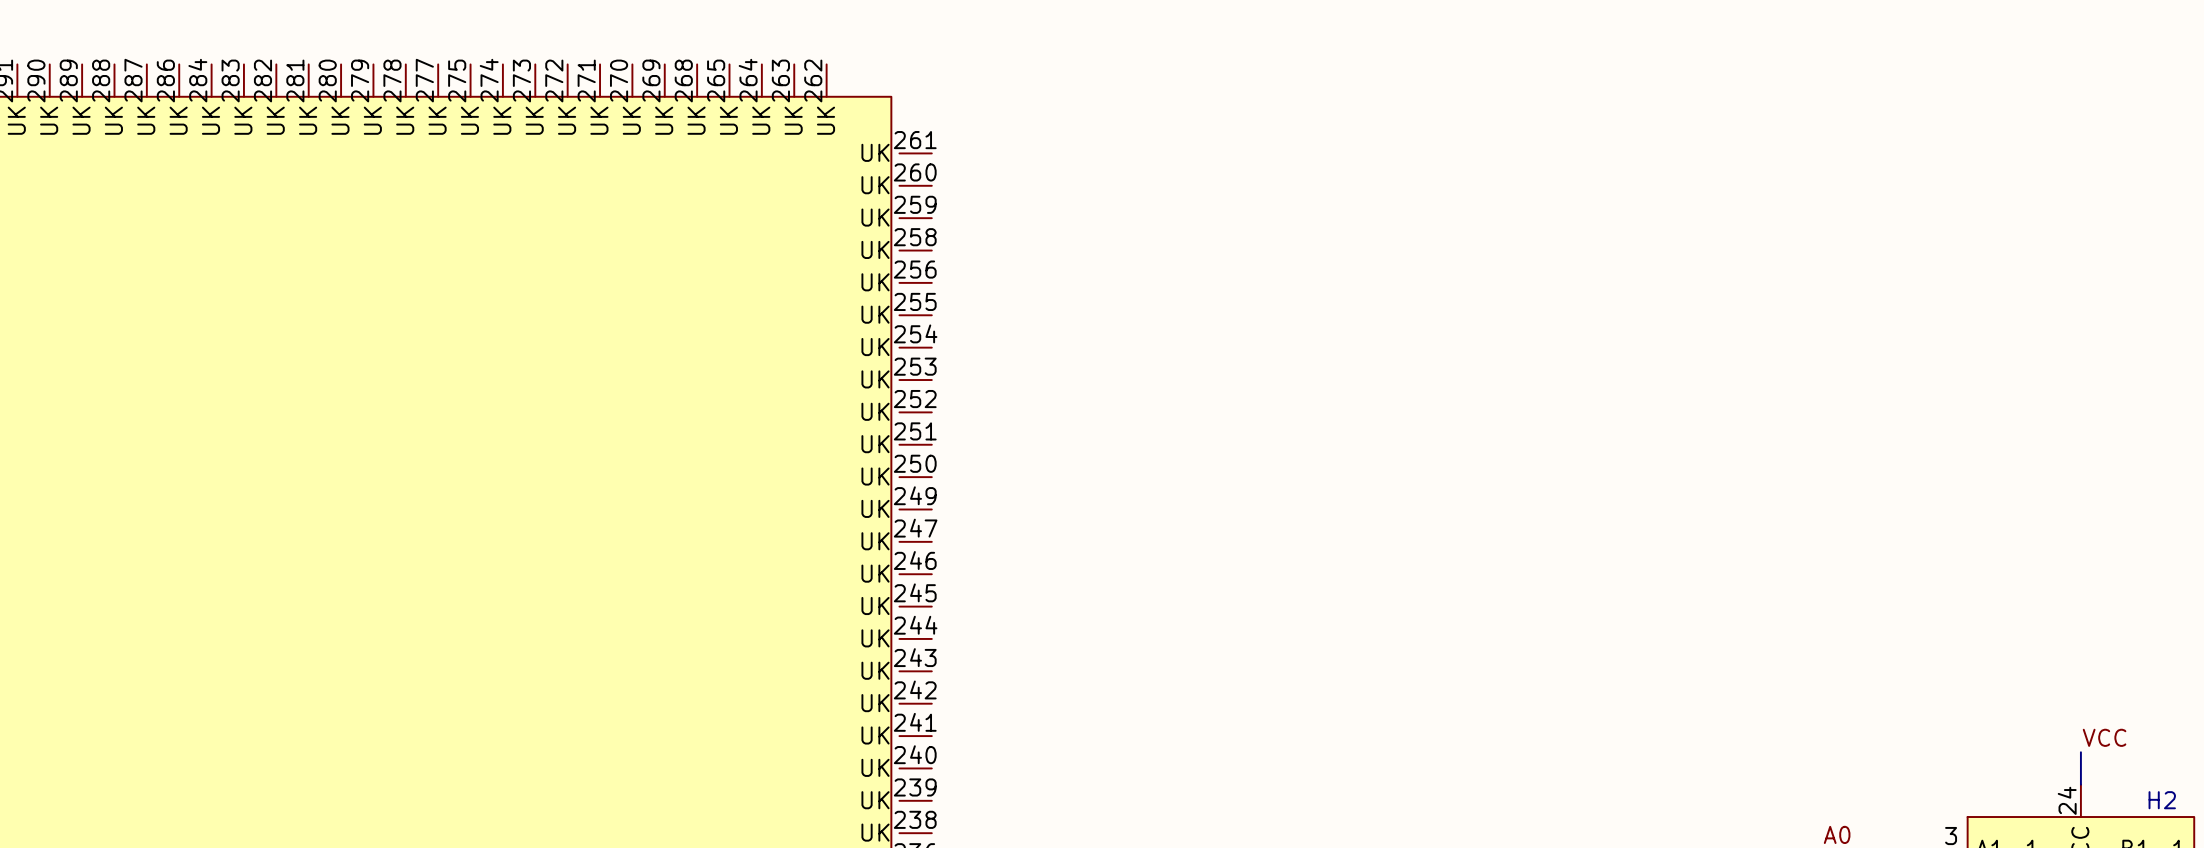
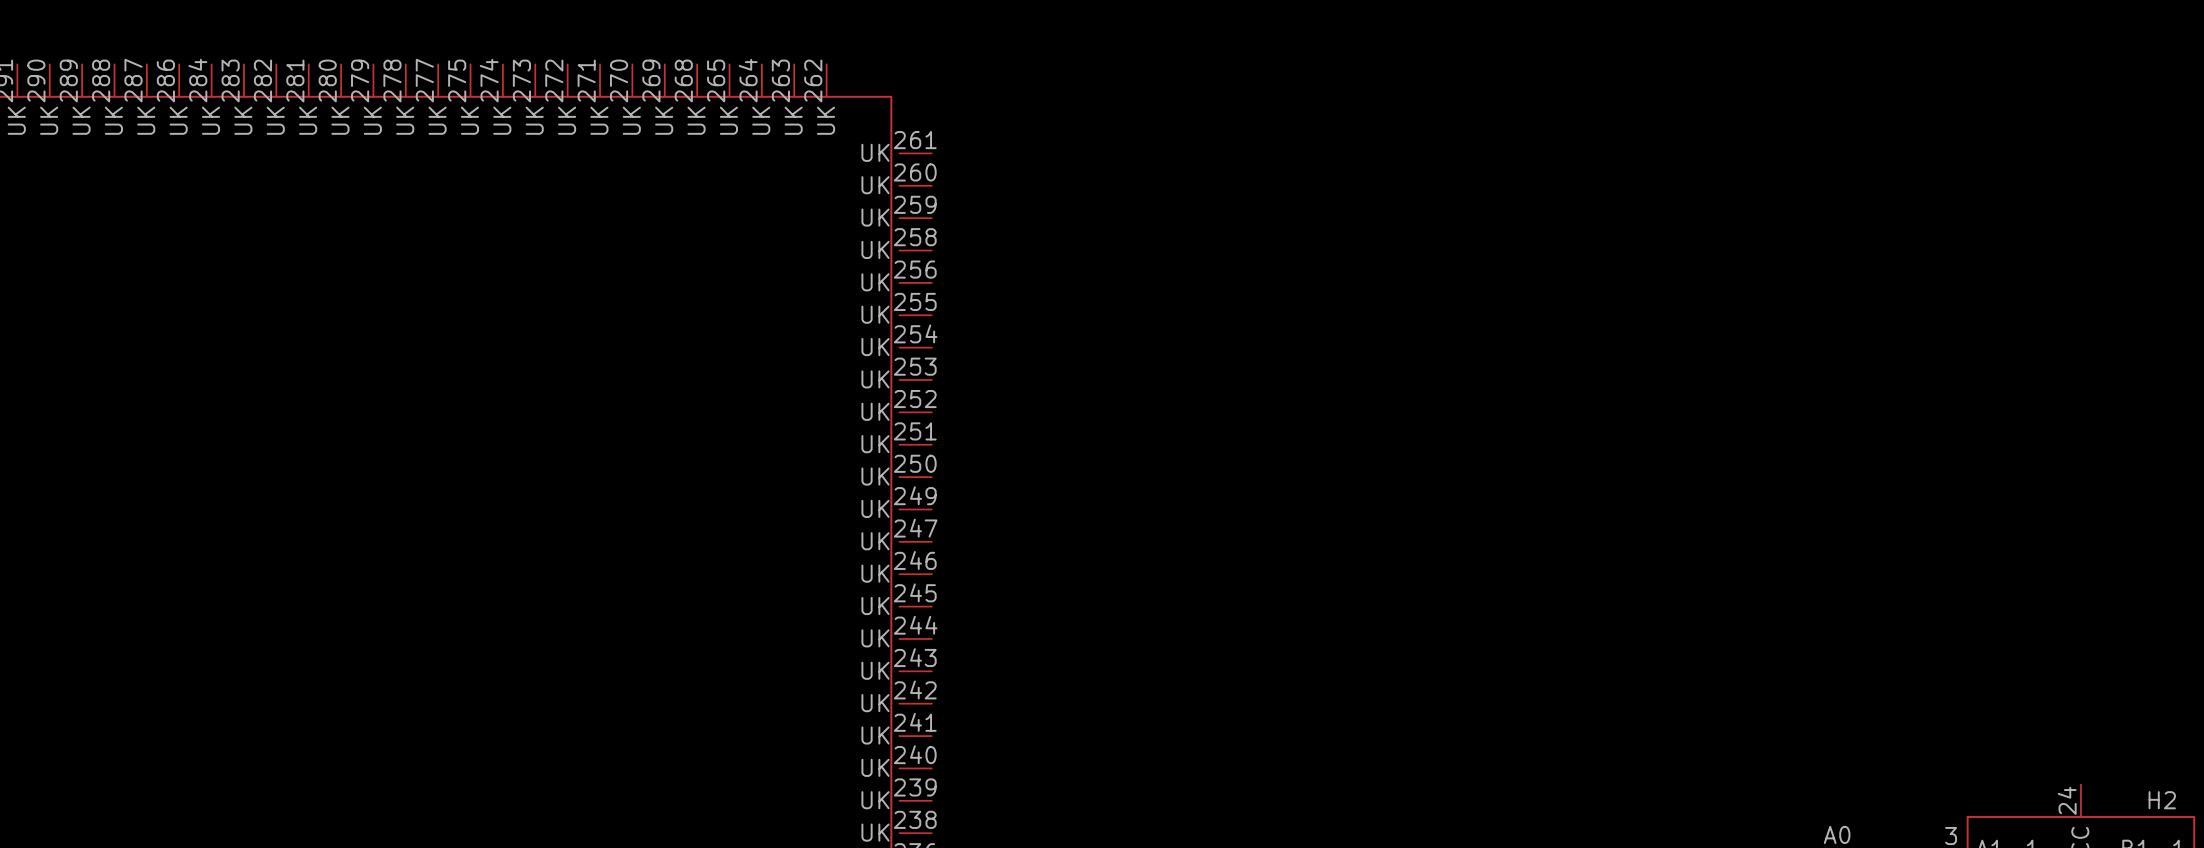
label: VCC (2104, 737) -> none
wire: (2080, 752) (2080, 784) -> none

